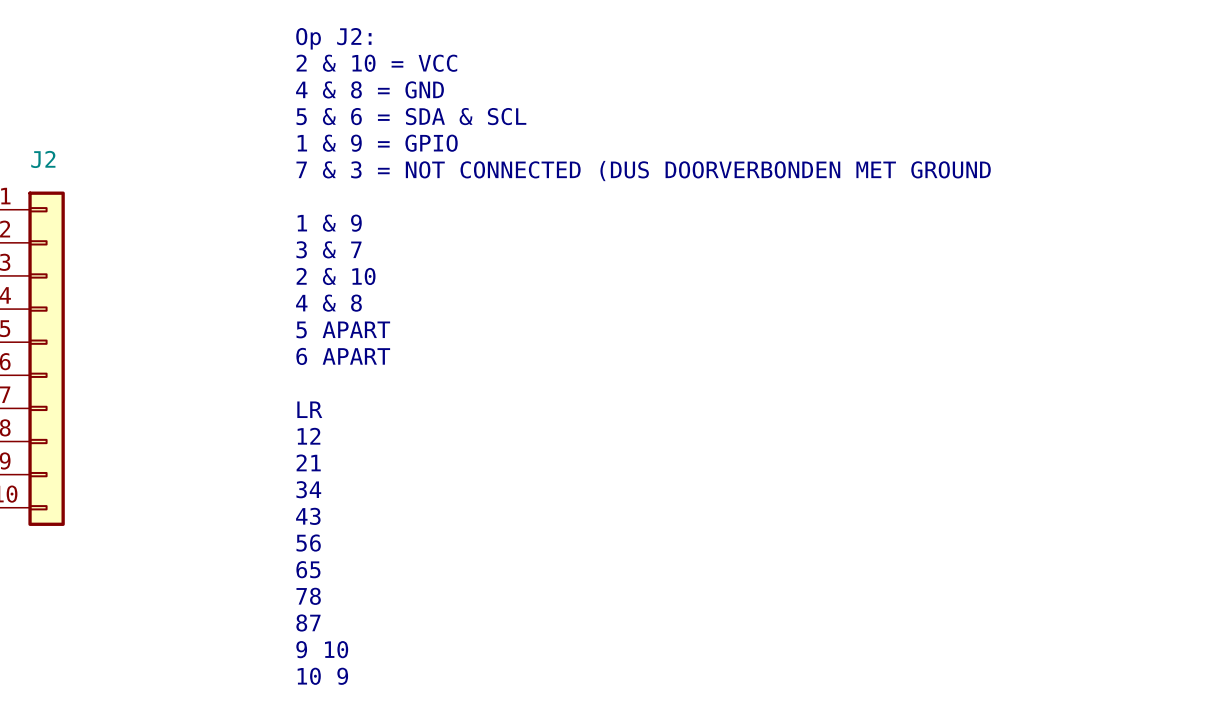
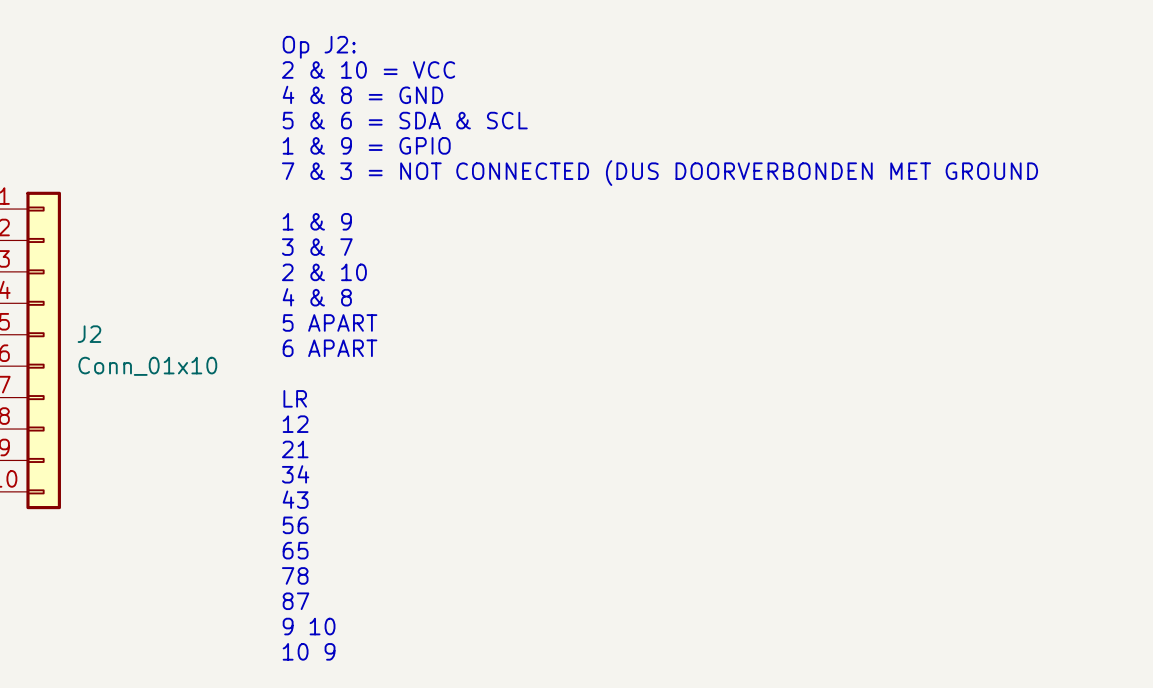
J2 name position: J2 (43, 159) -> J2 (89, 334)
J2 value: none -> Conn_01x10 (147, 366)

